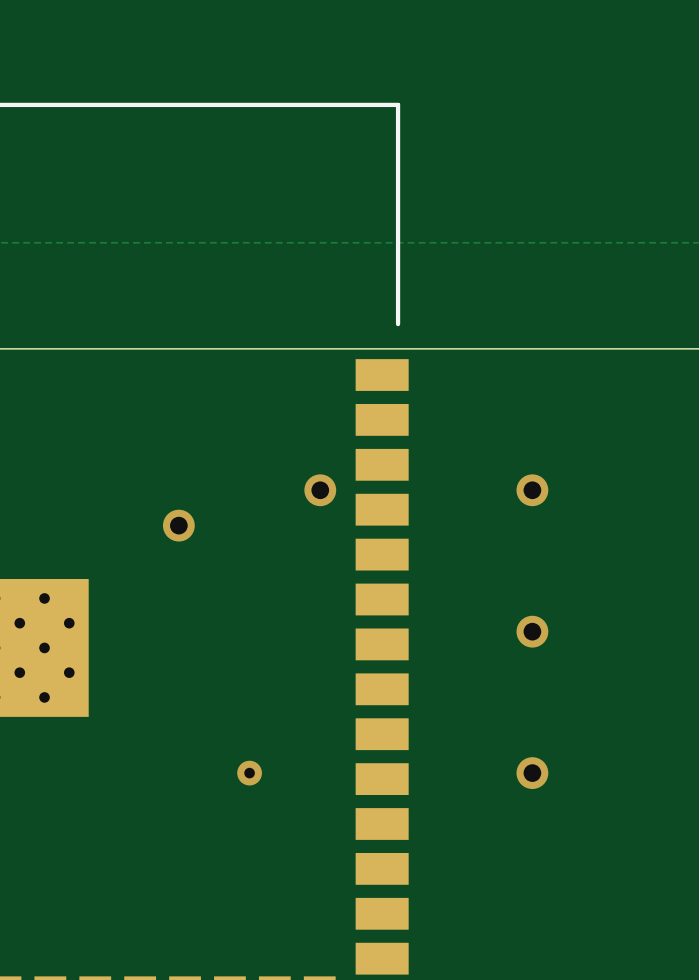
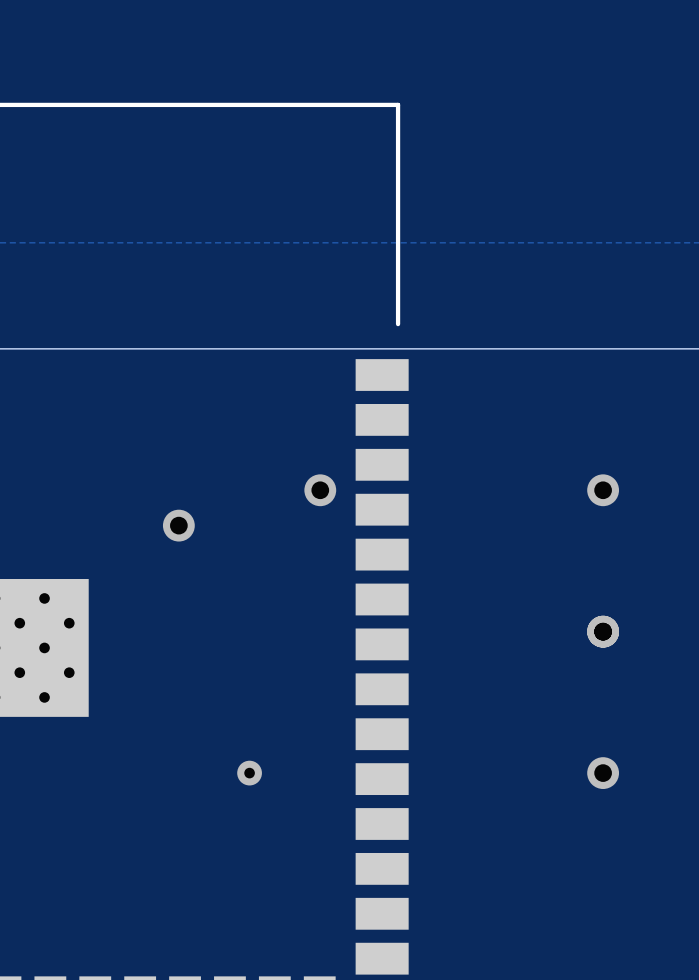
via position: (532, 490) -> (603, 490)
via position: (532, 631) -> (603, 631)
via position: (532, 773) -> (603, 773)

